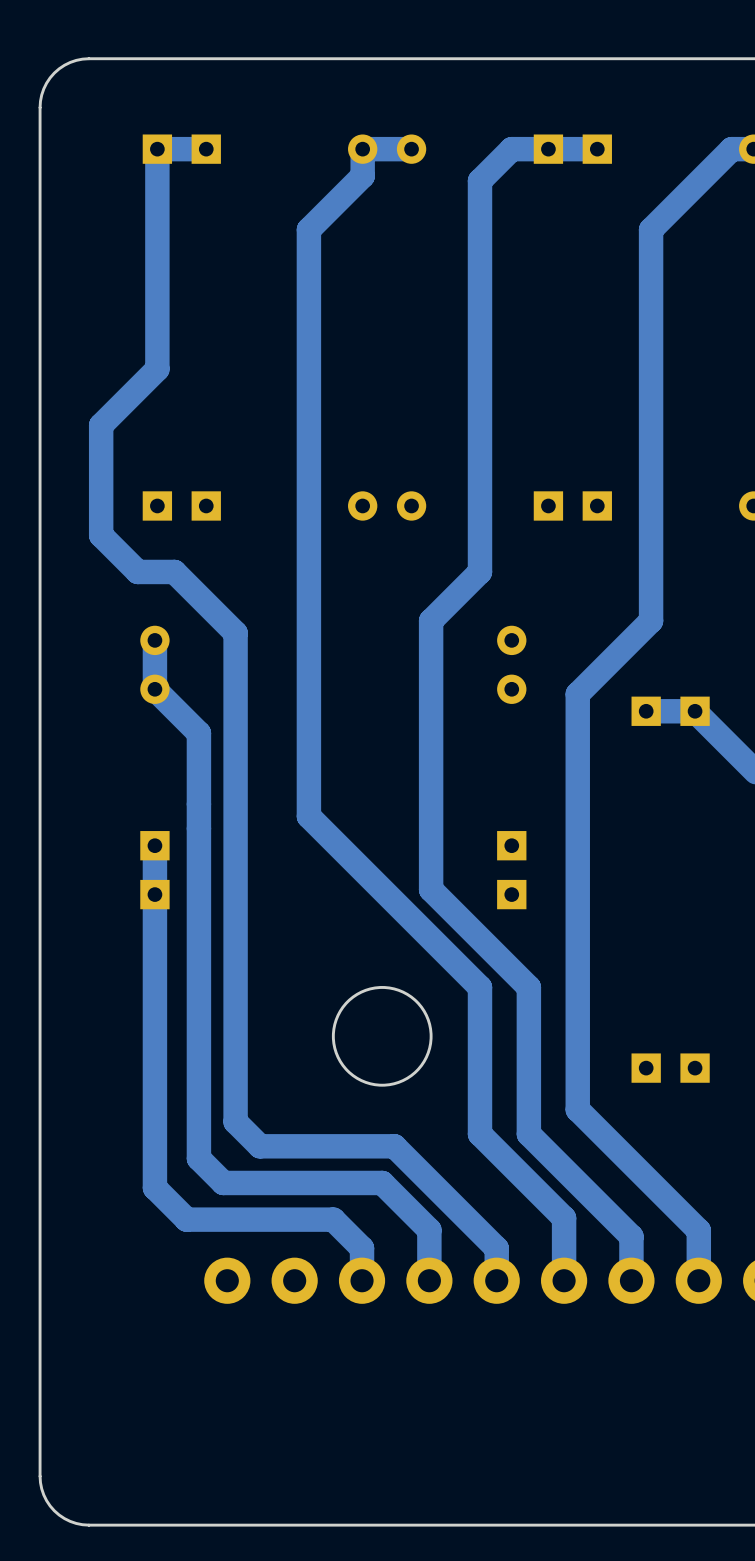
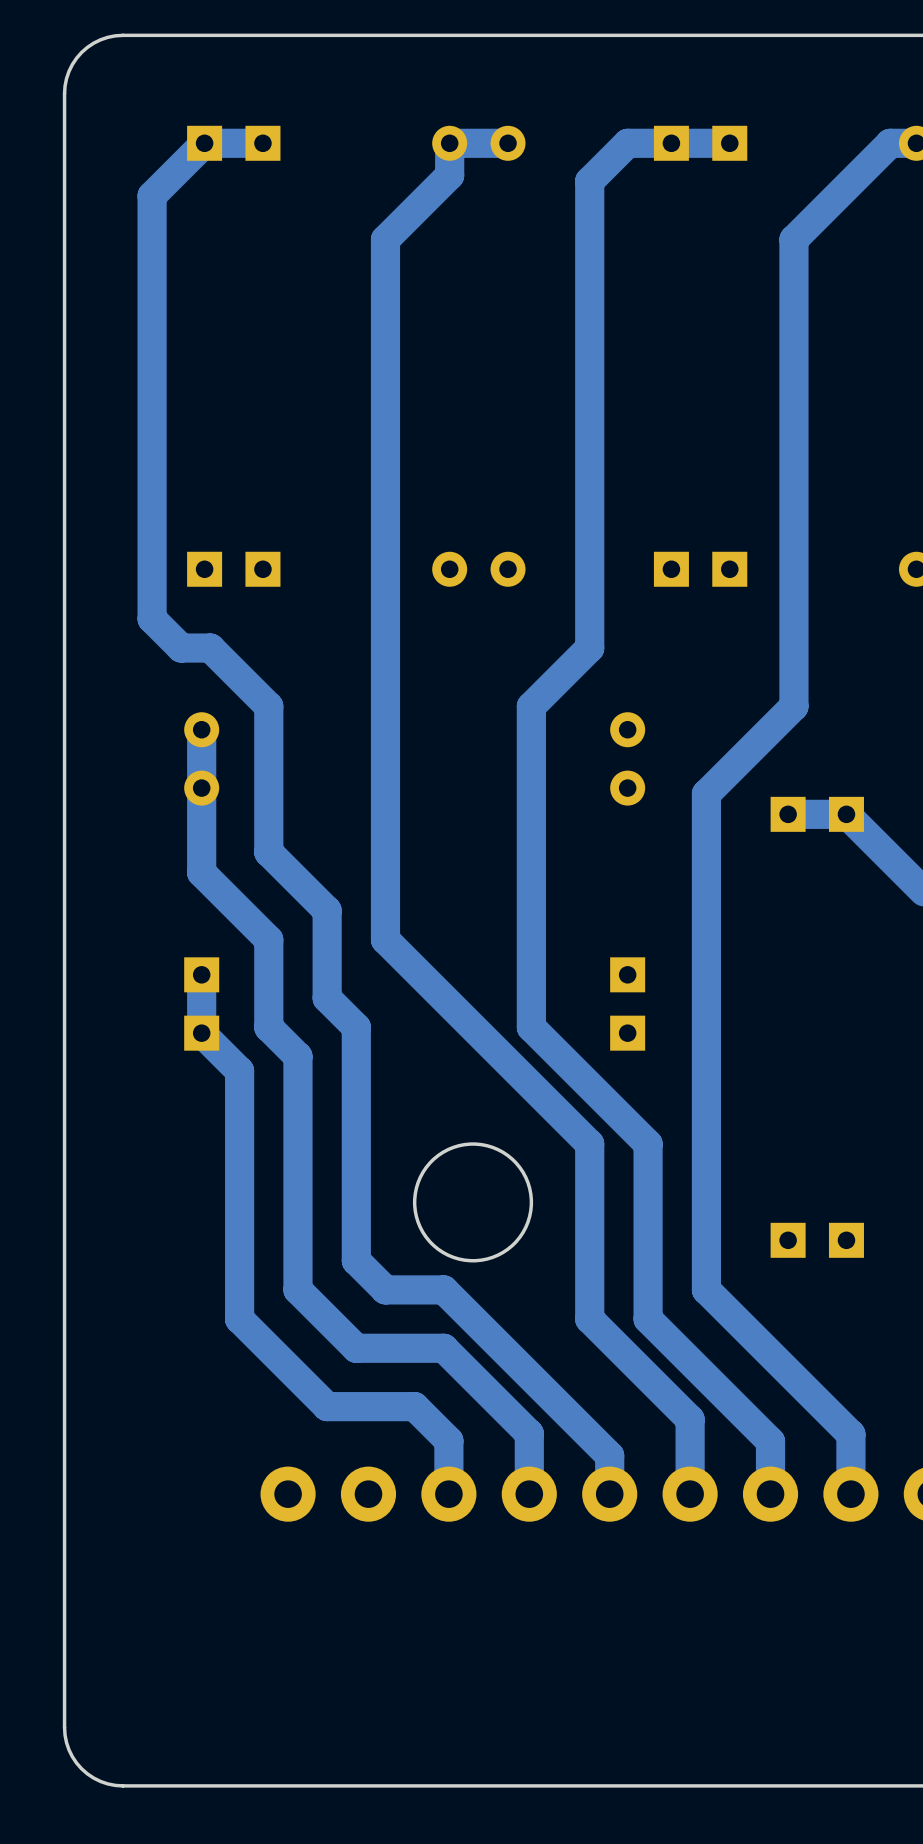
track: (157, 149) (157, 369) (101, 425) (101, 535) (113, 547) -> (204, 143) (152, 195) (152, 618)
track: (162, 571) (174, 571) (235, 633) (235, 914) -> (201, 788) (201, 872) (268, 939) (268, 1027) (297, 1056)
track: none -> (210, 648) (268, 706) (268, 852) (327, 910) (327, 998) (356, 1027) (356, 1260) (385, 1289) (443, 1289) (487, 1333)
track: (154, 689) (198, 733) (198, 1158) (223, 1182) (382, 1182) -> none
track: (154, 894) (154, 1187) (186, 1219) (333, 1219) (362, 1248) -> (201, 1033) (239, 1071) (239, 1319) (327, 1406) (414, 1406) (448, 1440) (448, 1455)
track: (235, 1109) (235, 1121) (260, 1146) (394, 1146) -> (297, 1289) (356, 1348) (443, 1348) (473, 1377)

